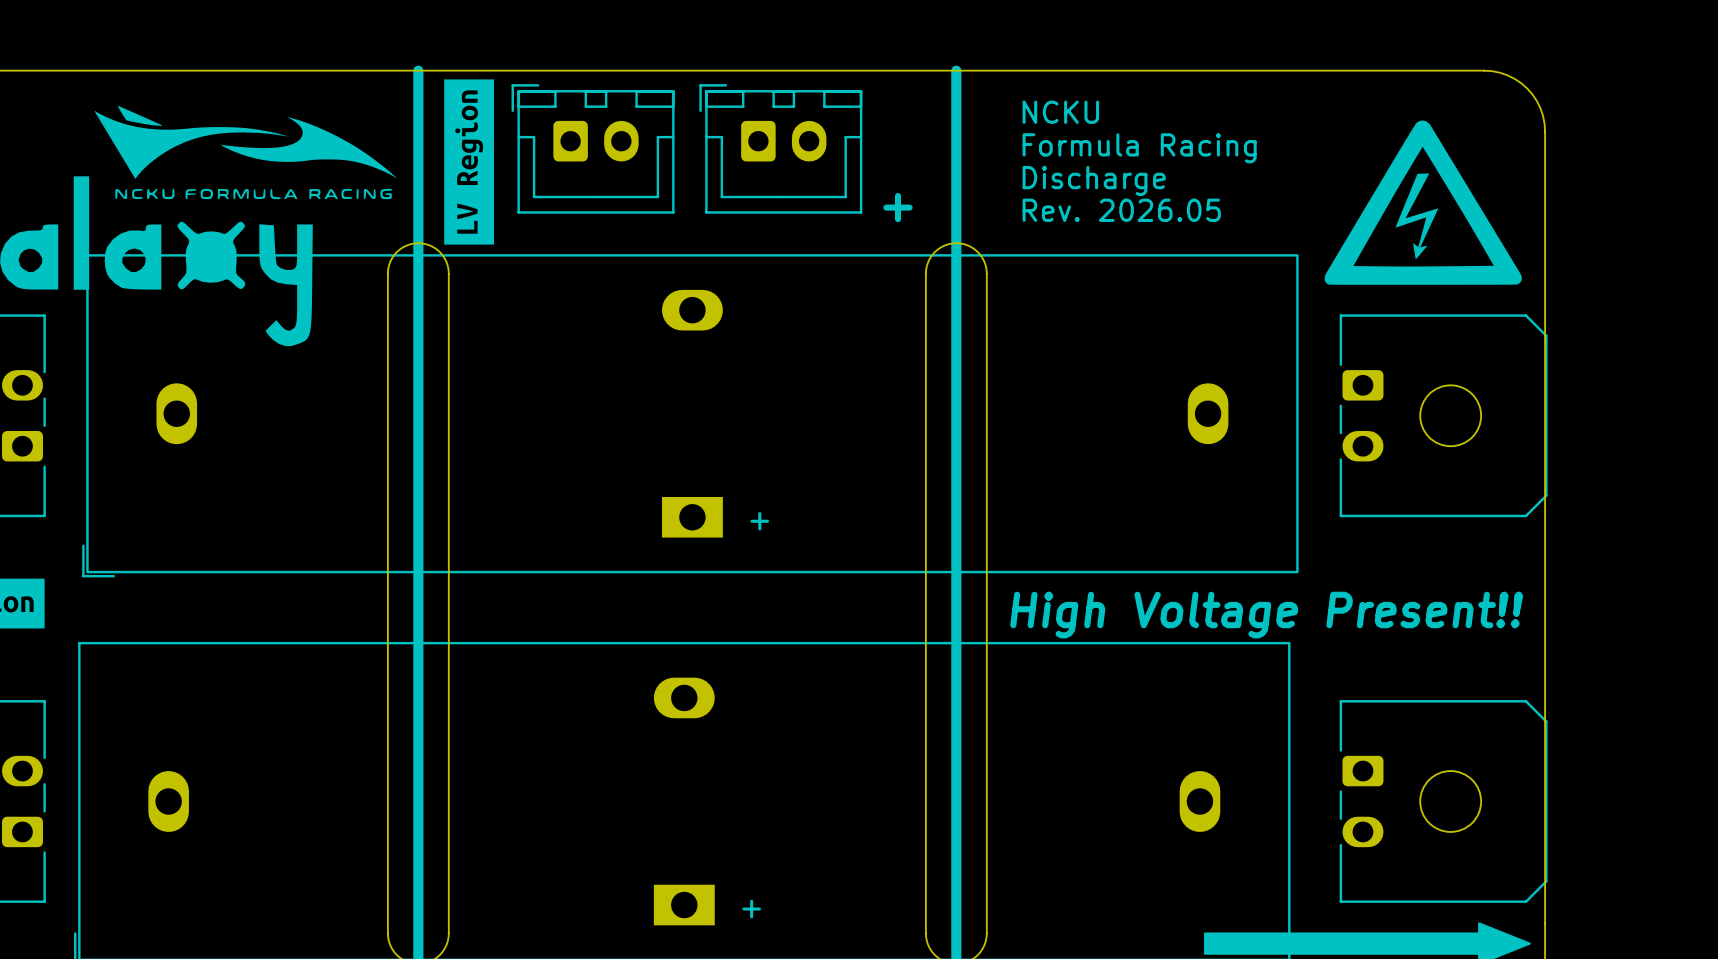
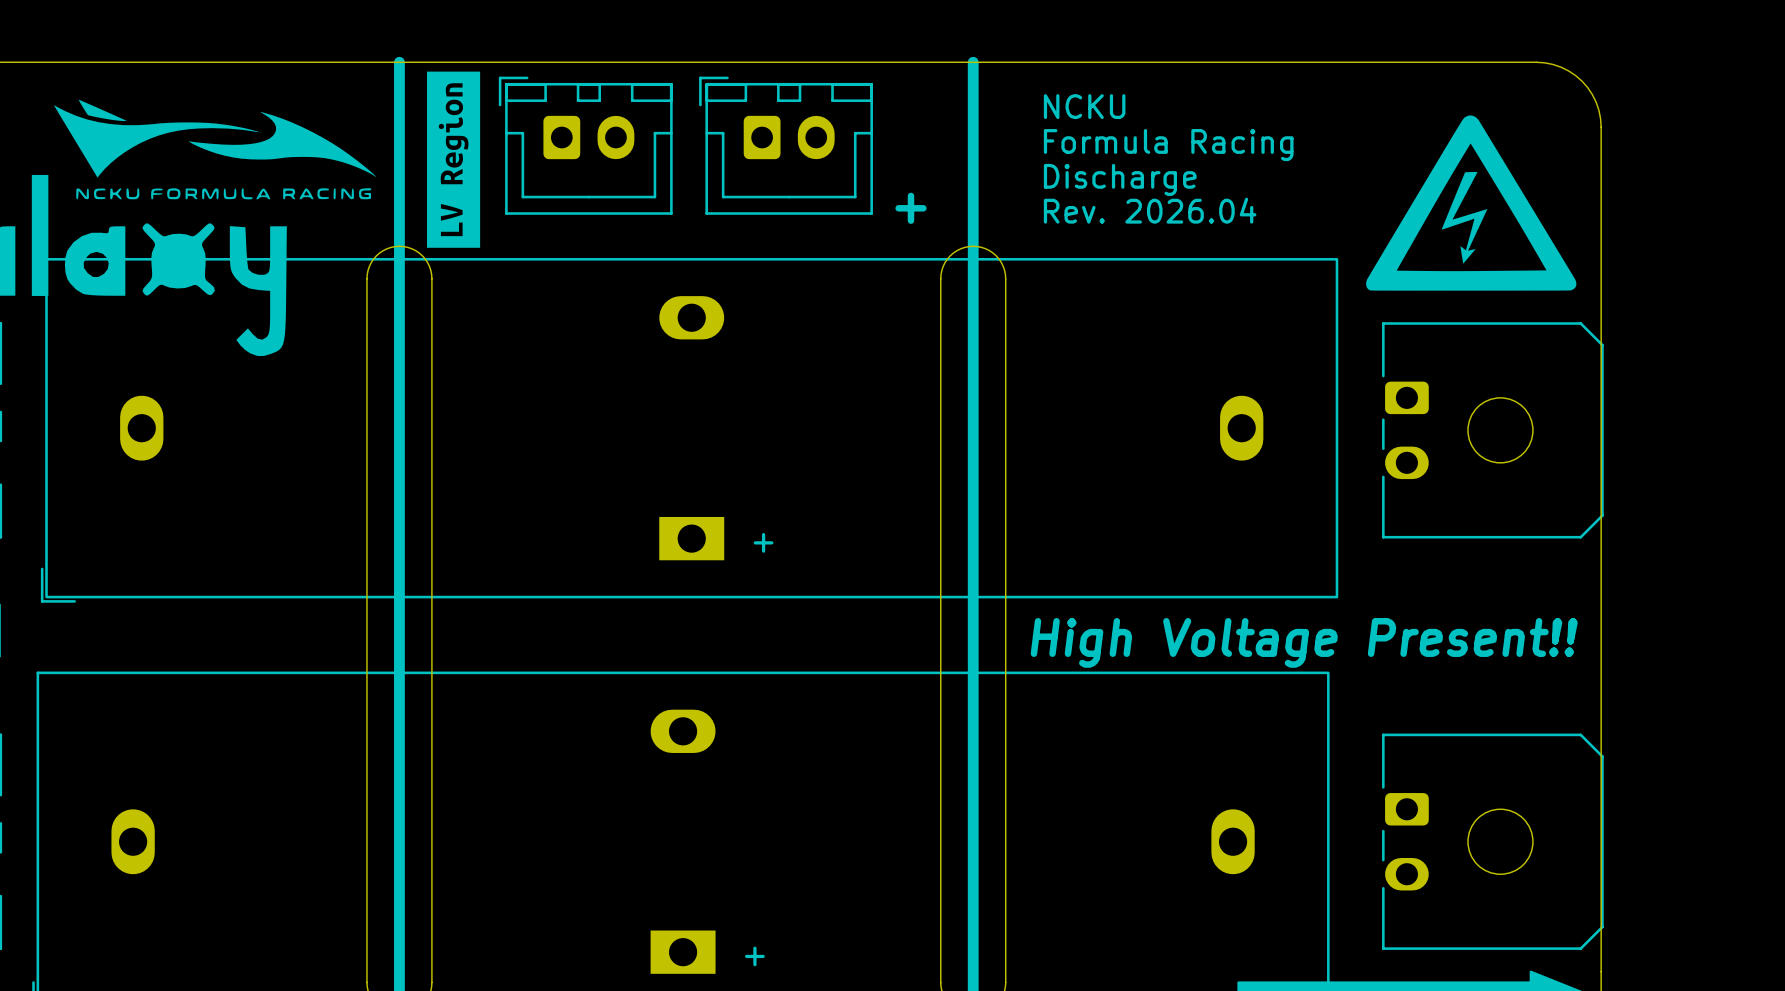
text: Rev. 2026.05 (1121, 210) -> Rev. 2026.04 (1150, 210)

